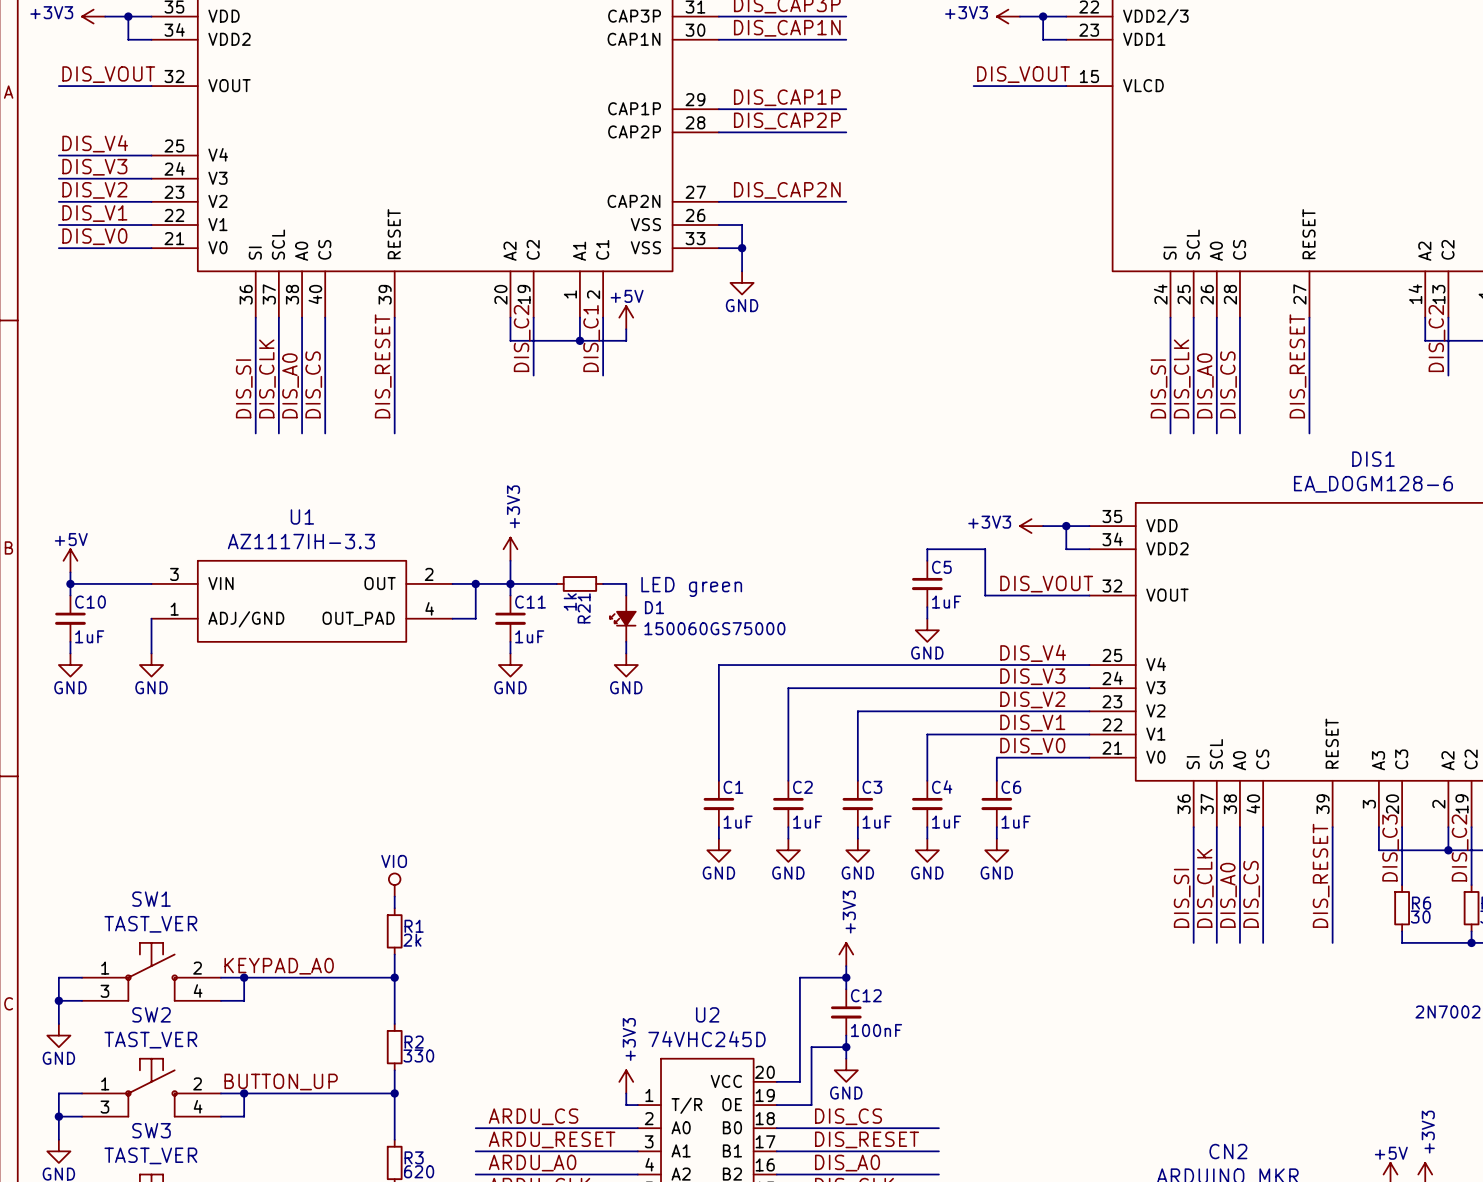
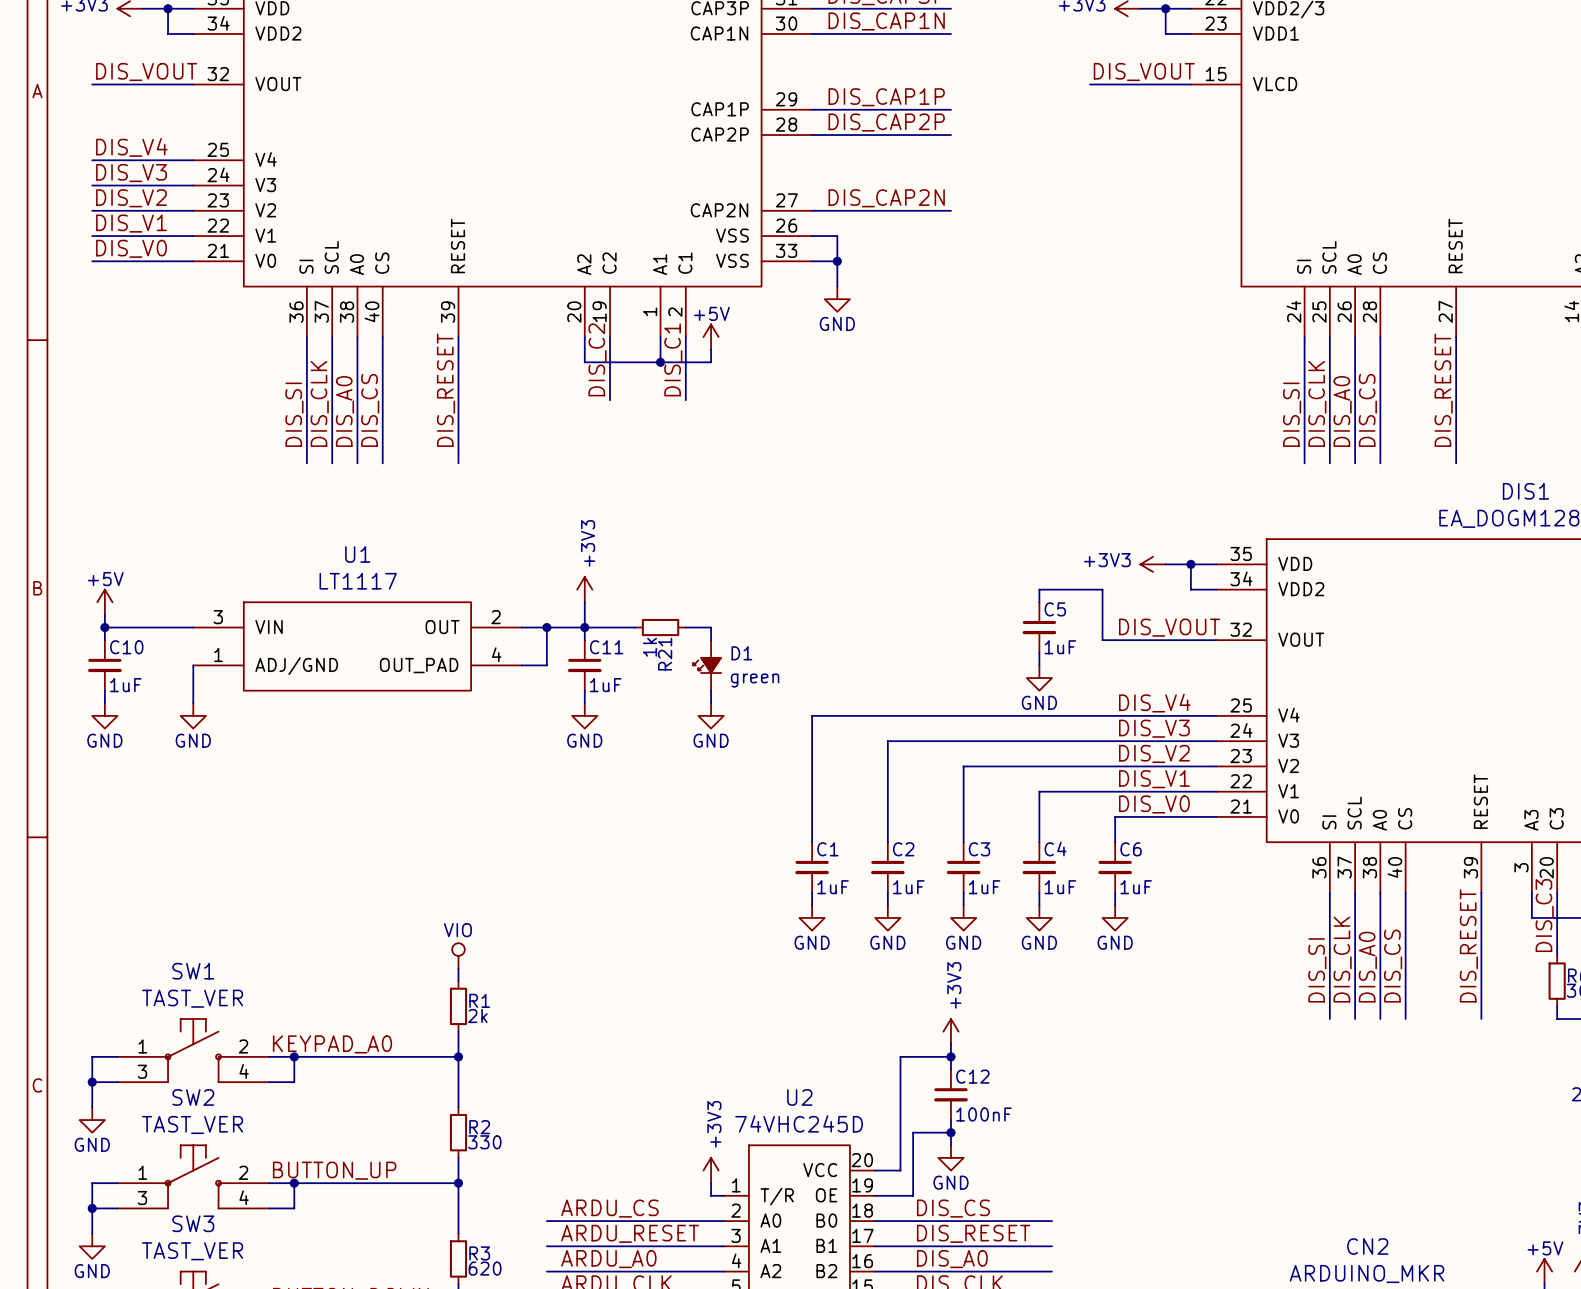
U1 value: AZ1117IH-3.3 (301, 541) -> LT1117 (358, 581)
text: LED green (691, 586) -> none
D1 value: 150060GS75000 (714, 628) -> green (755, 680)

